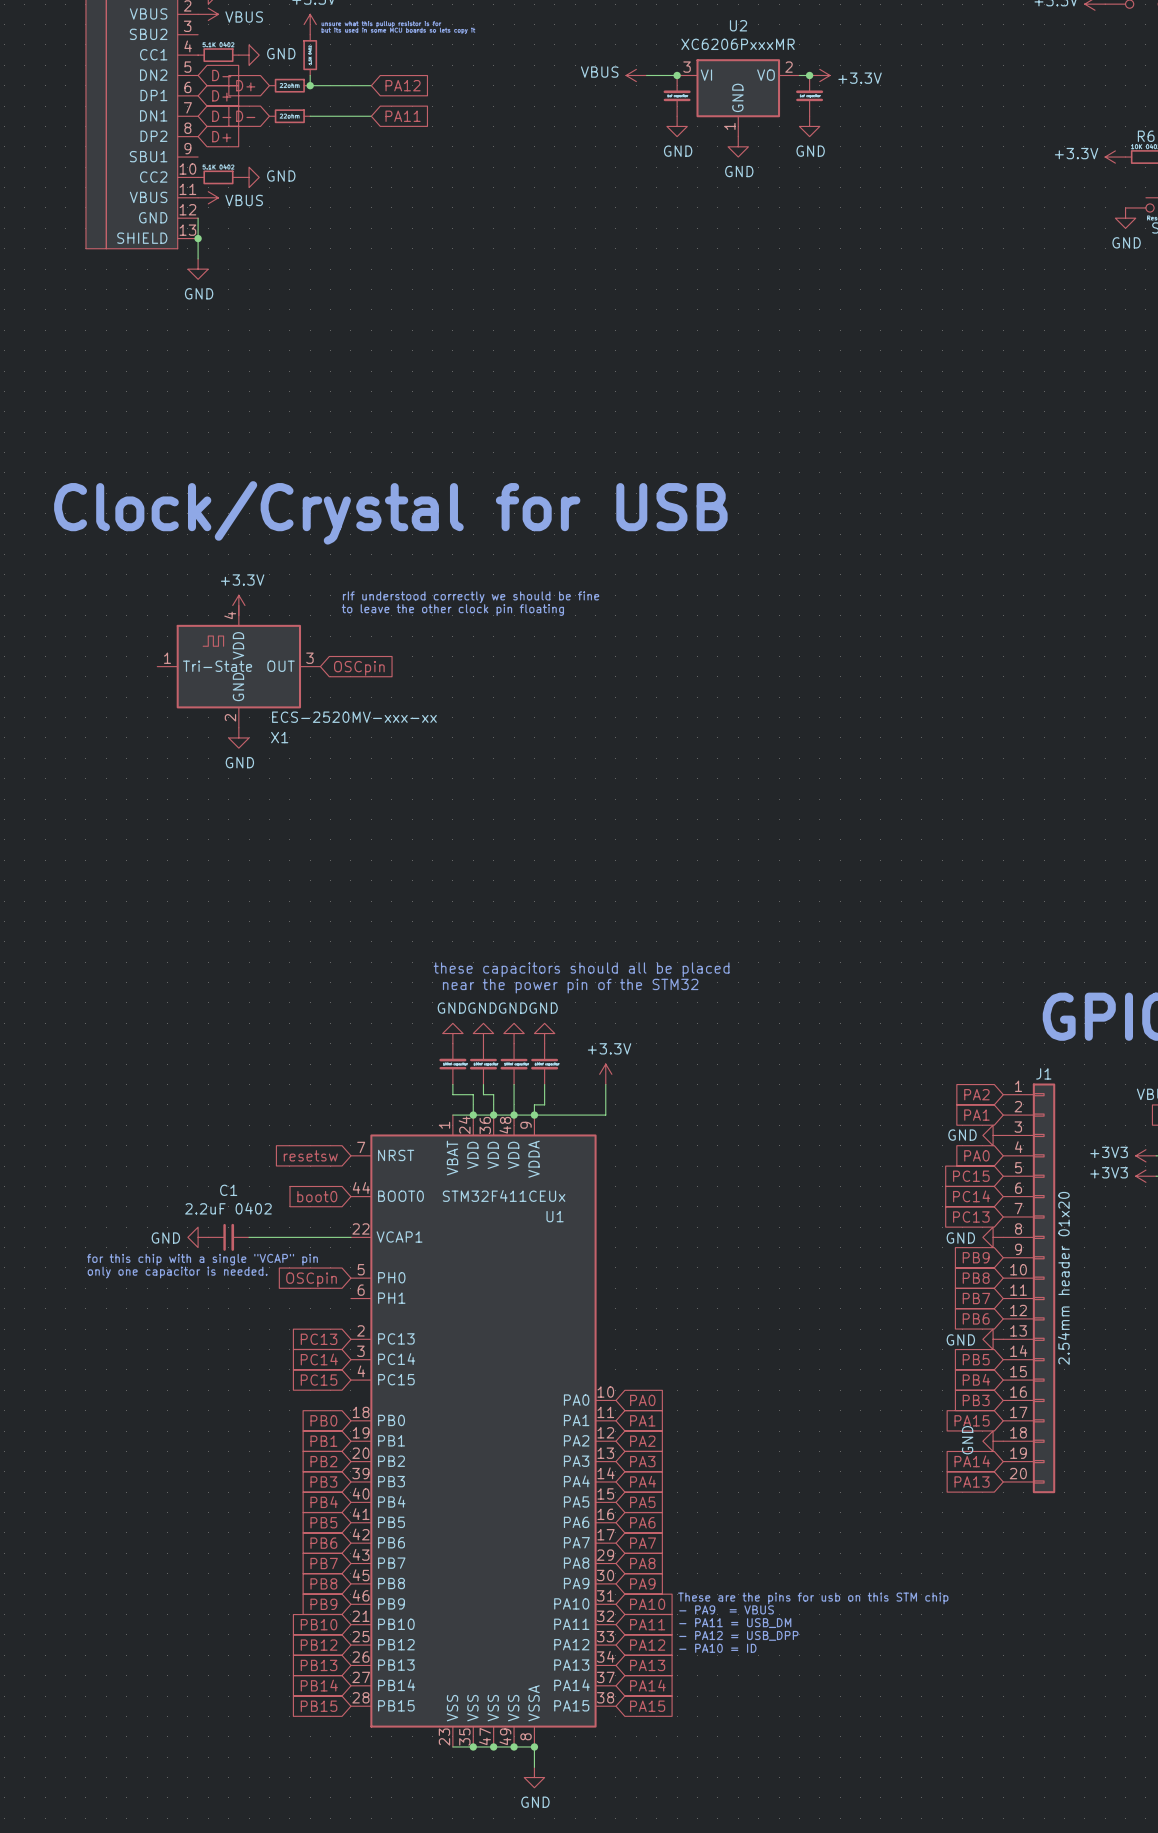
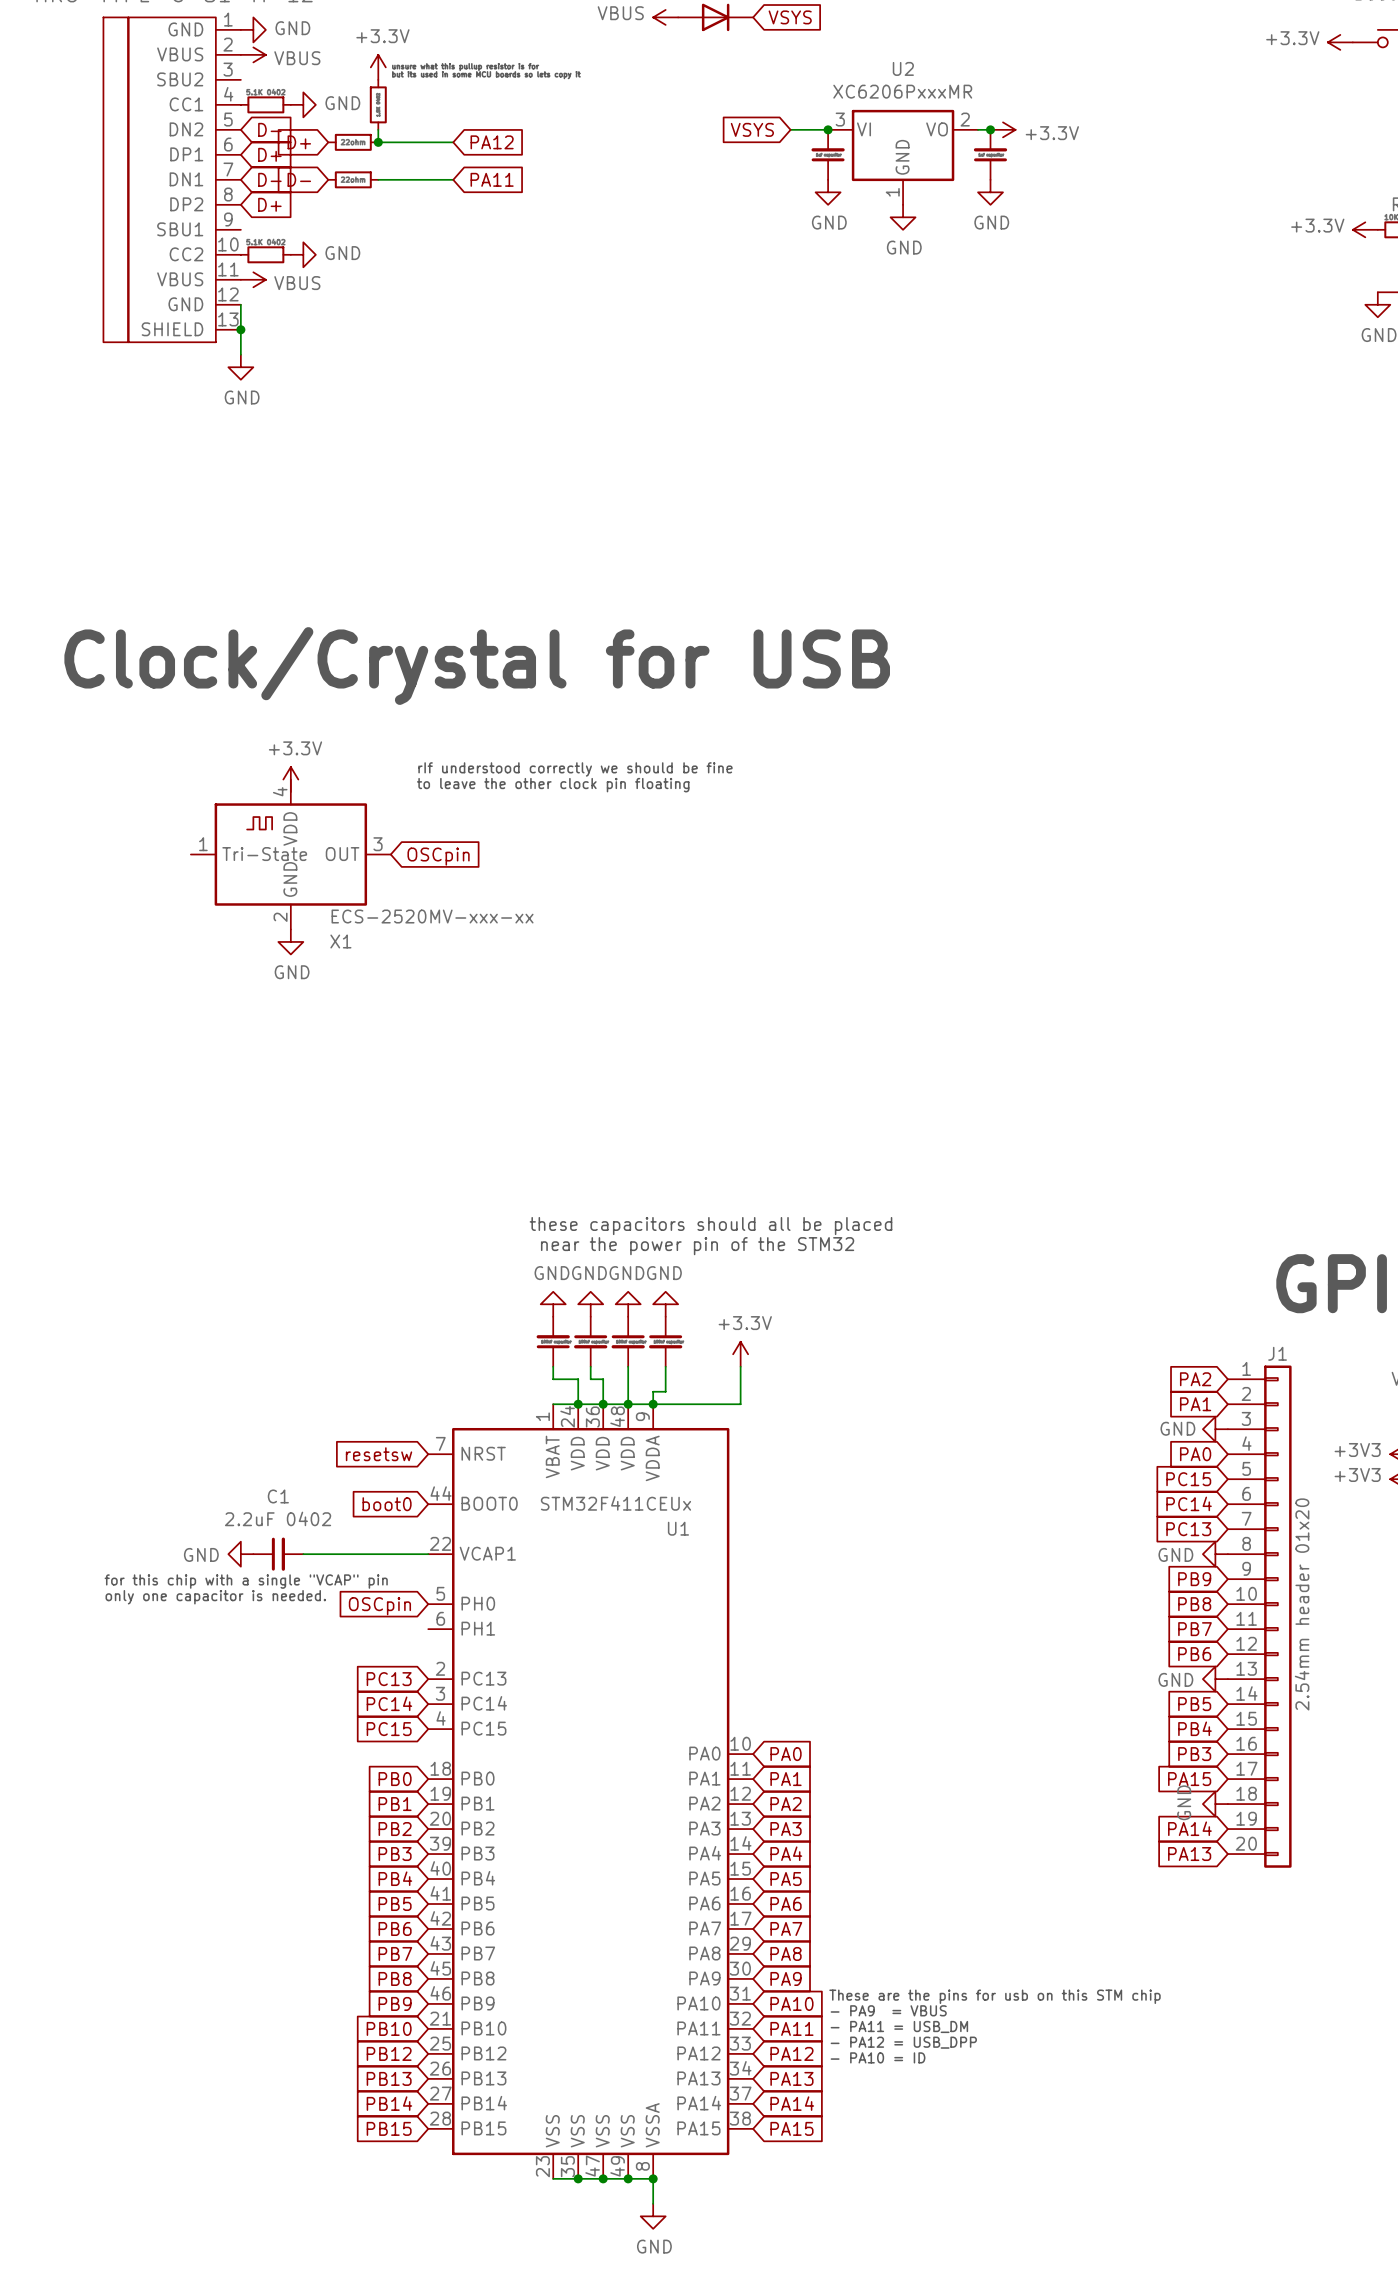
global label: none -> VSYS (752, 129)
power symbol: VBUS (636, 75) -> none

